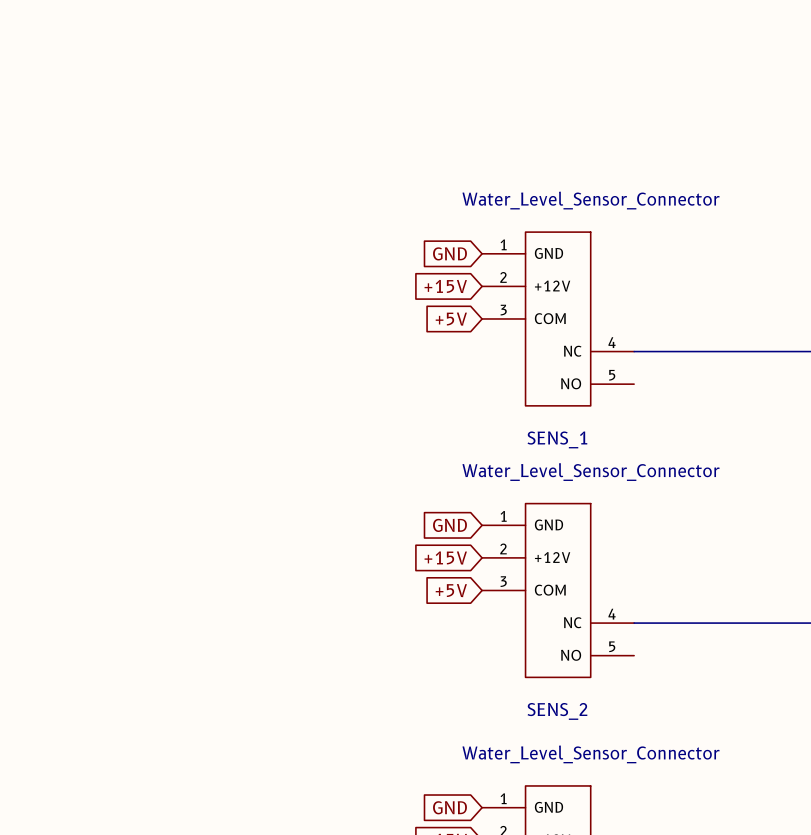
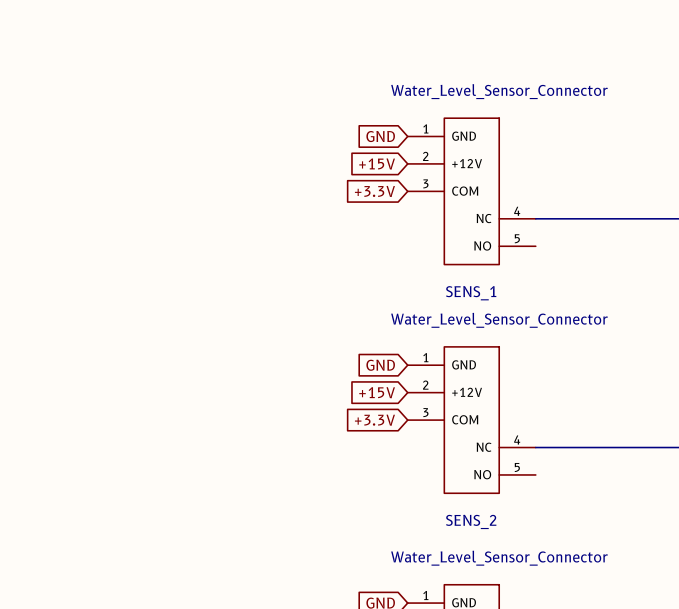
global label: +5V (451, 319) -> +3.3V (374, 191)
global label: +5V (451, 590) -> +3.3V (374, 420)

